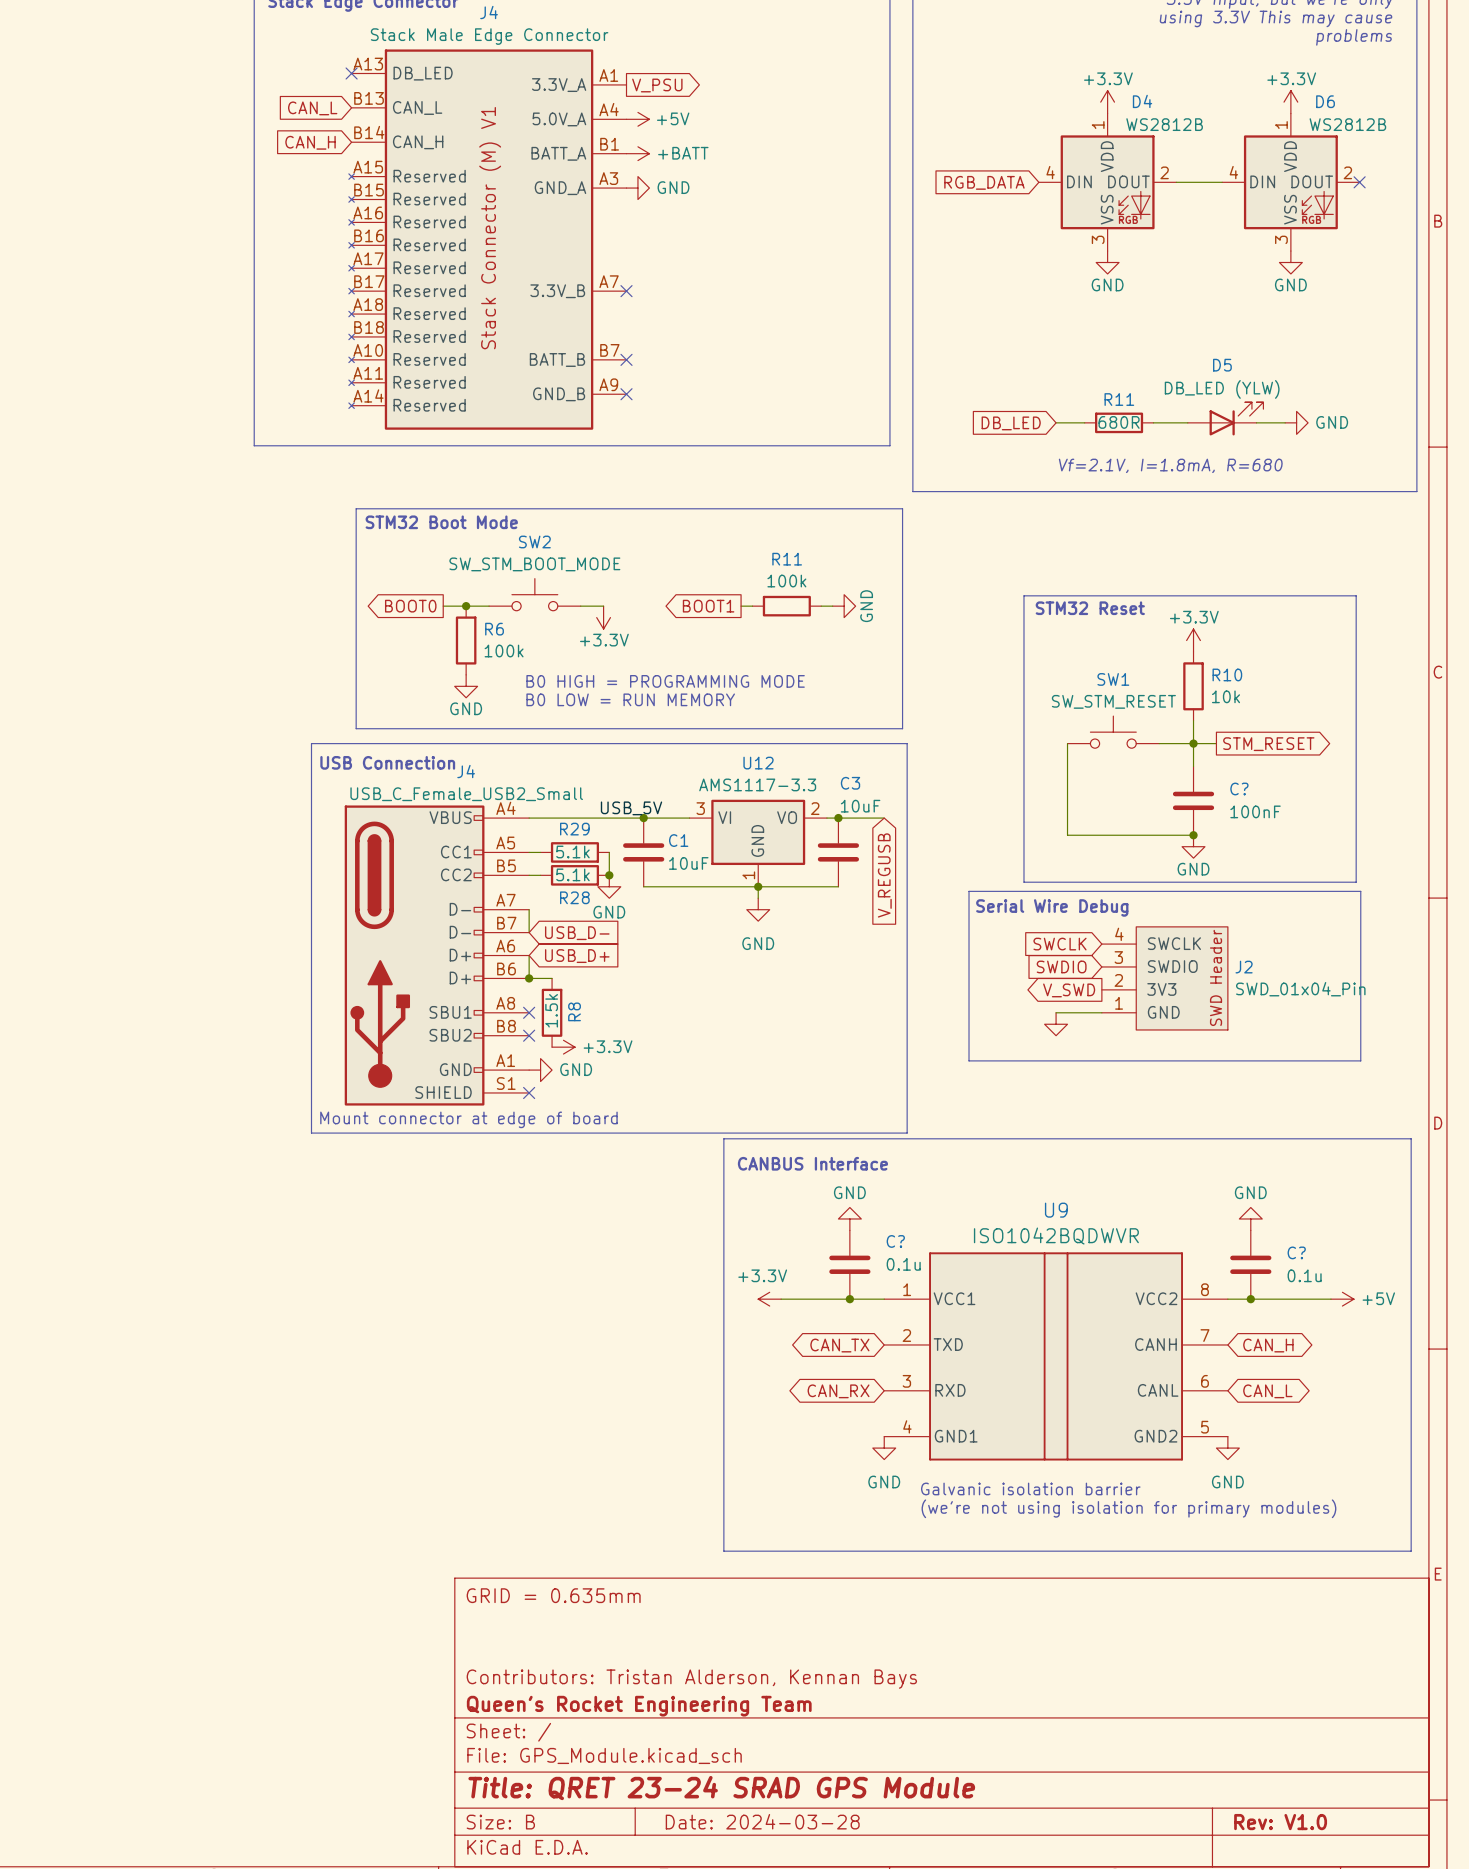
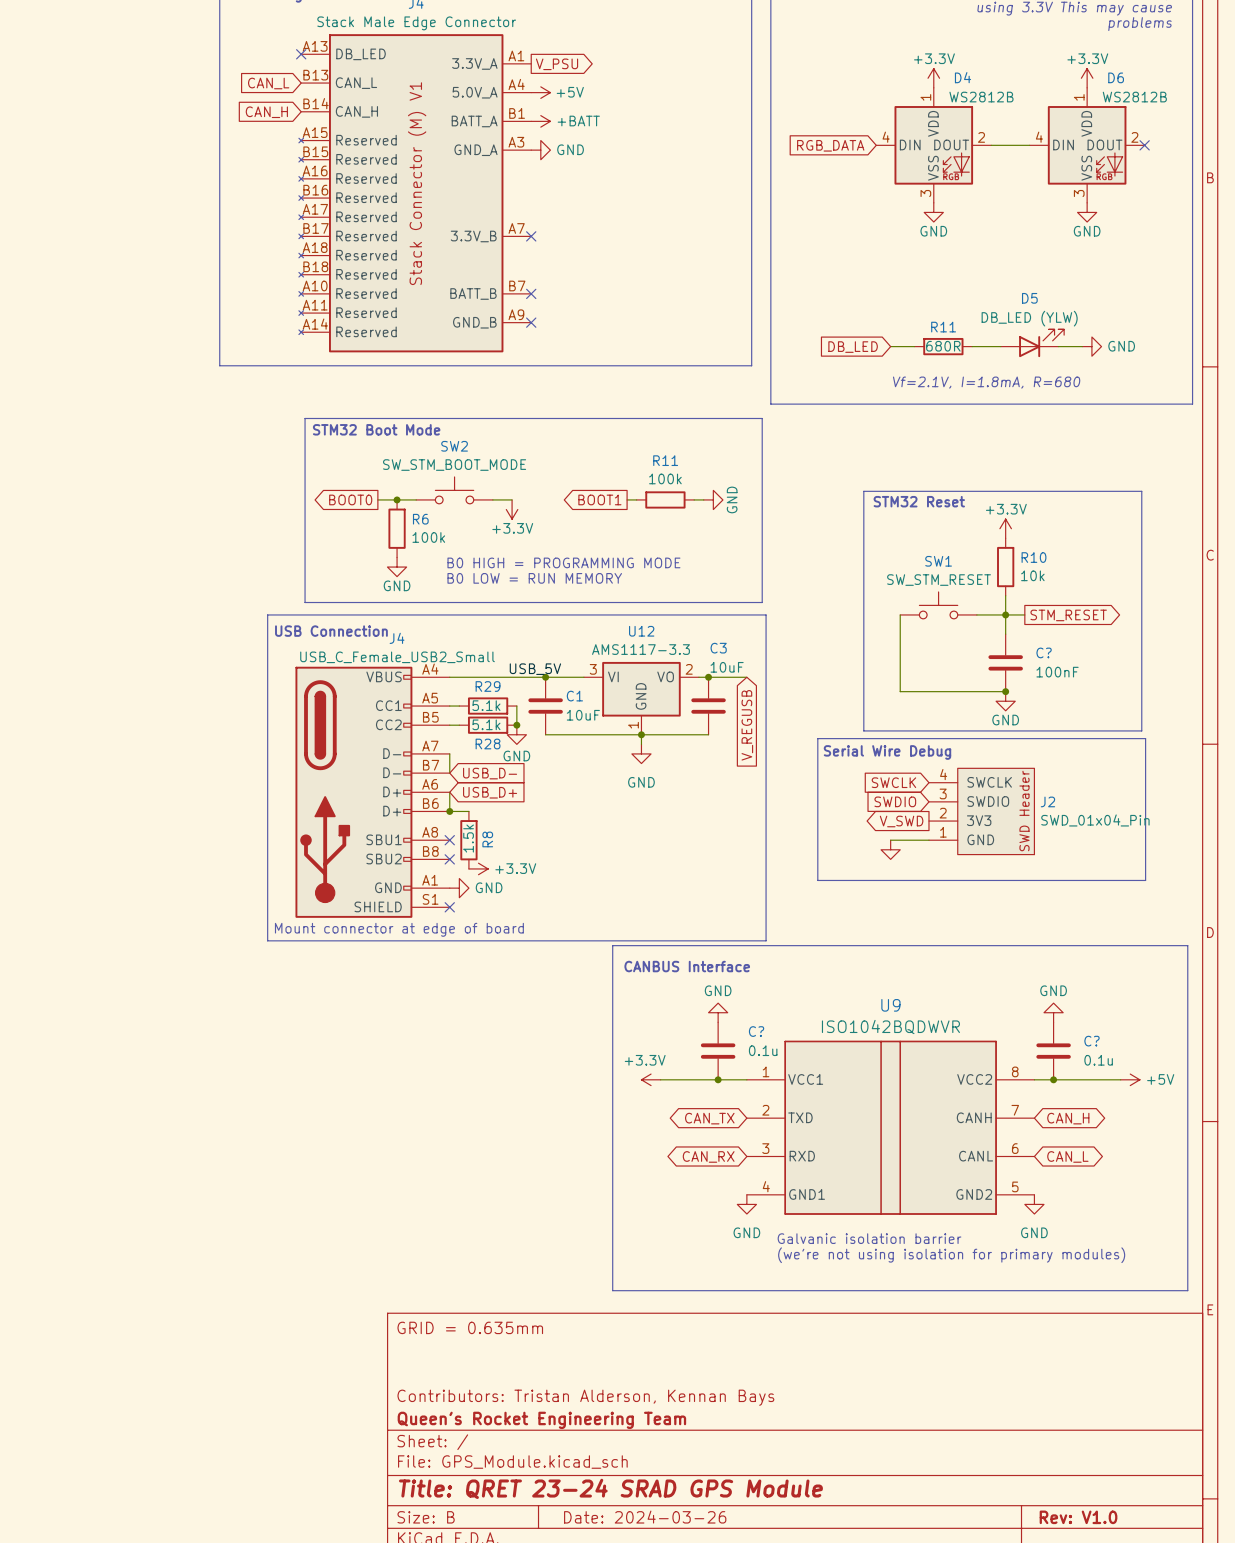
title block: Date: 2024-03-28 (762, 1821) -> Date: 2024-03-26 (645, 1517)

